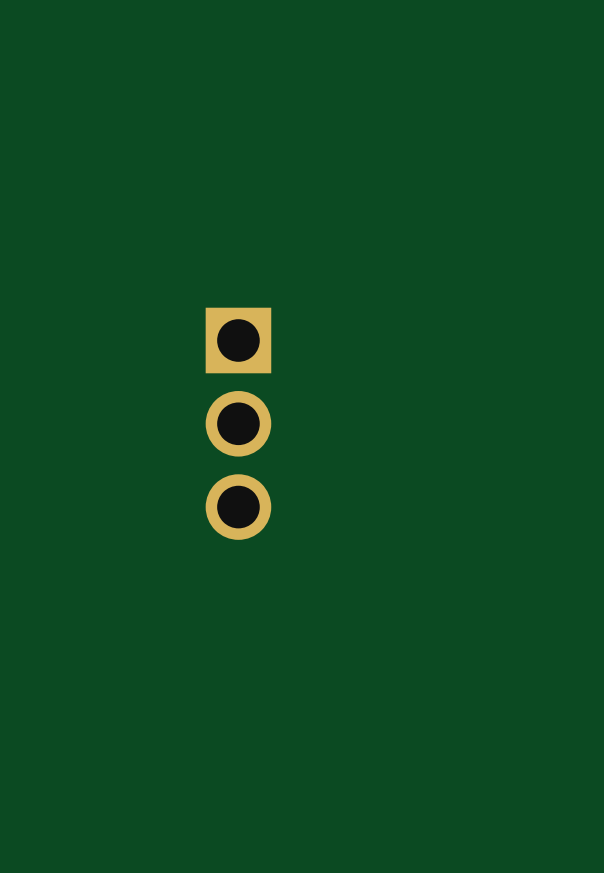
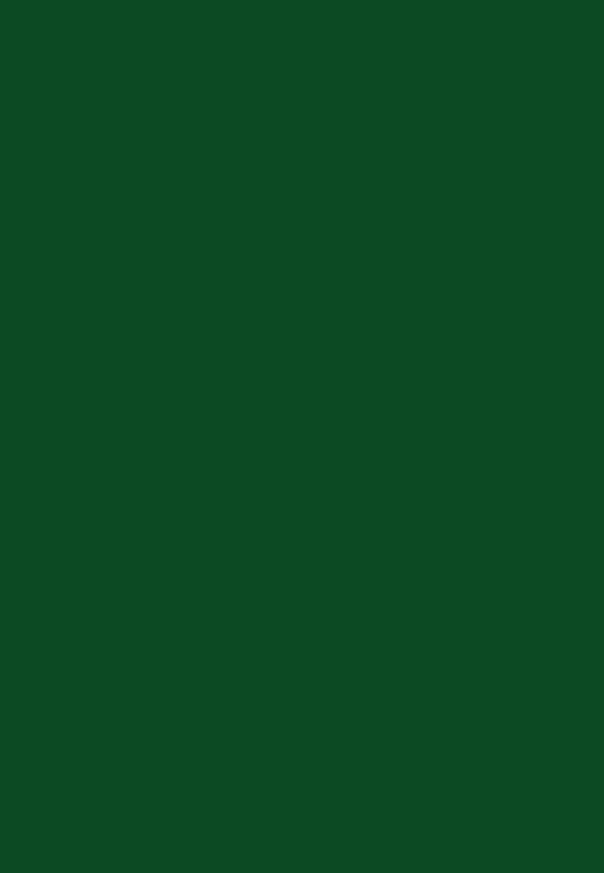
part: (238, 423) -> none

